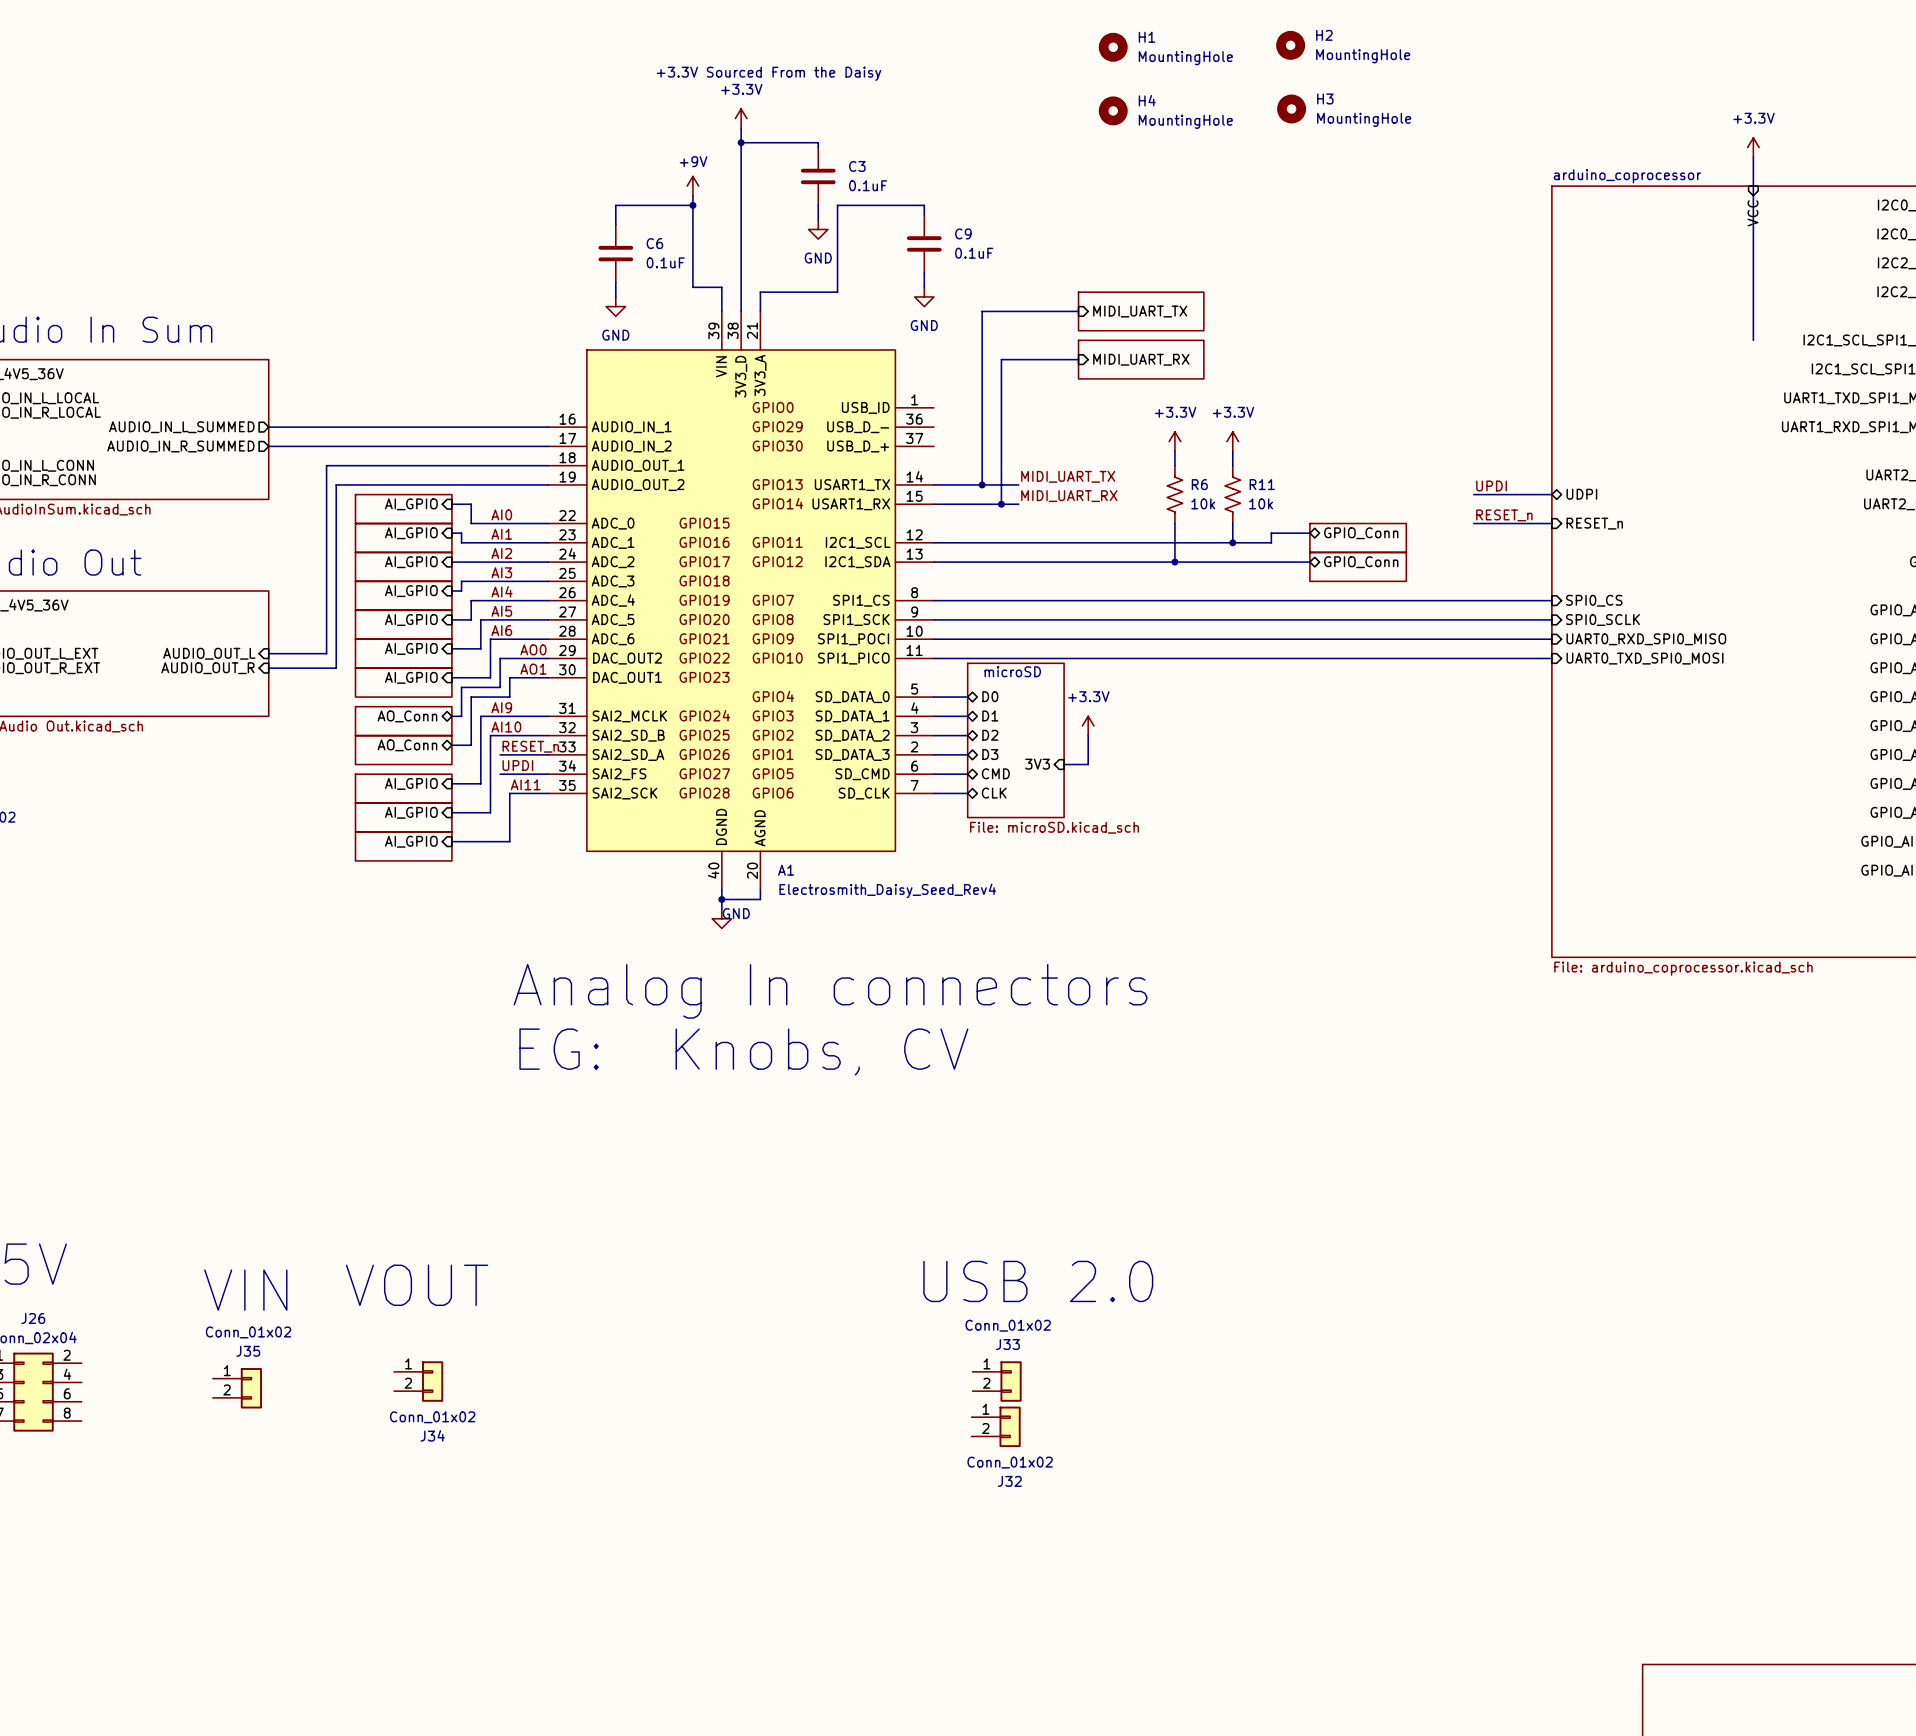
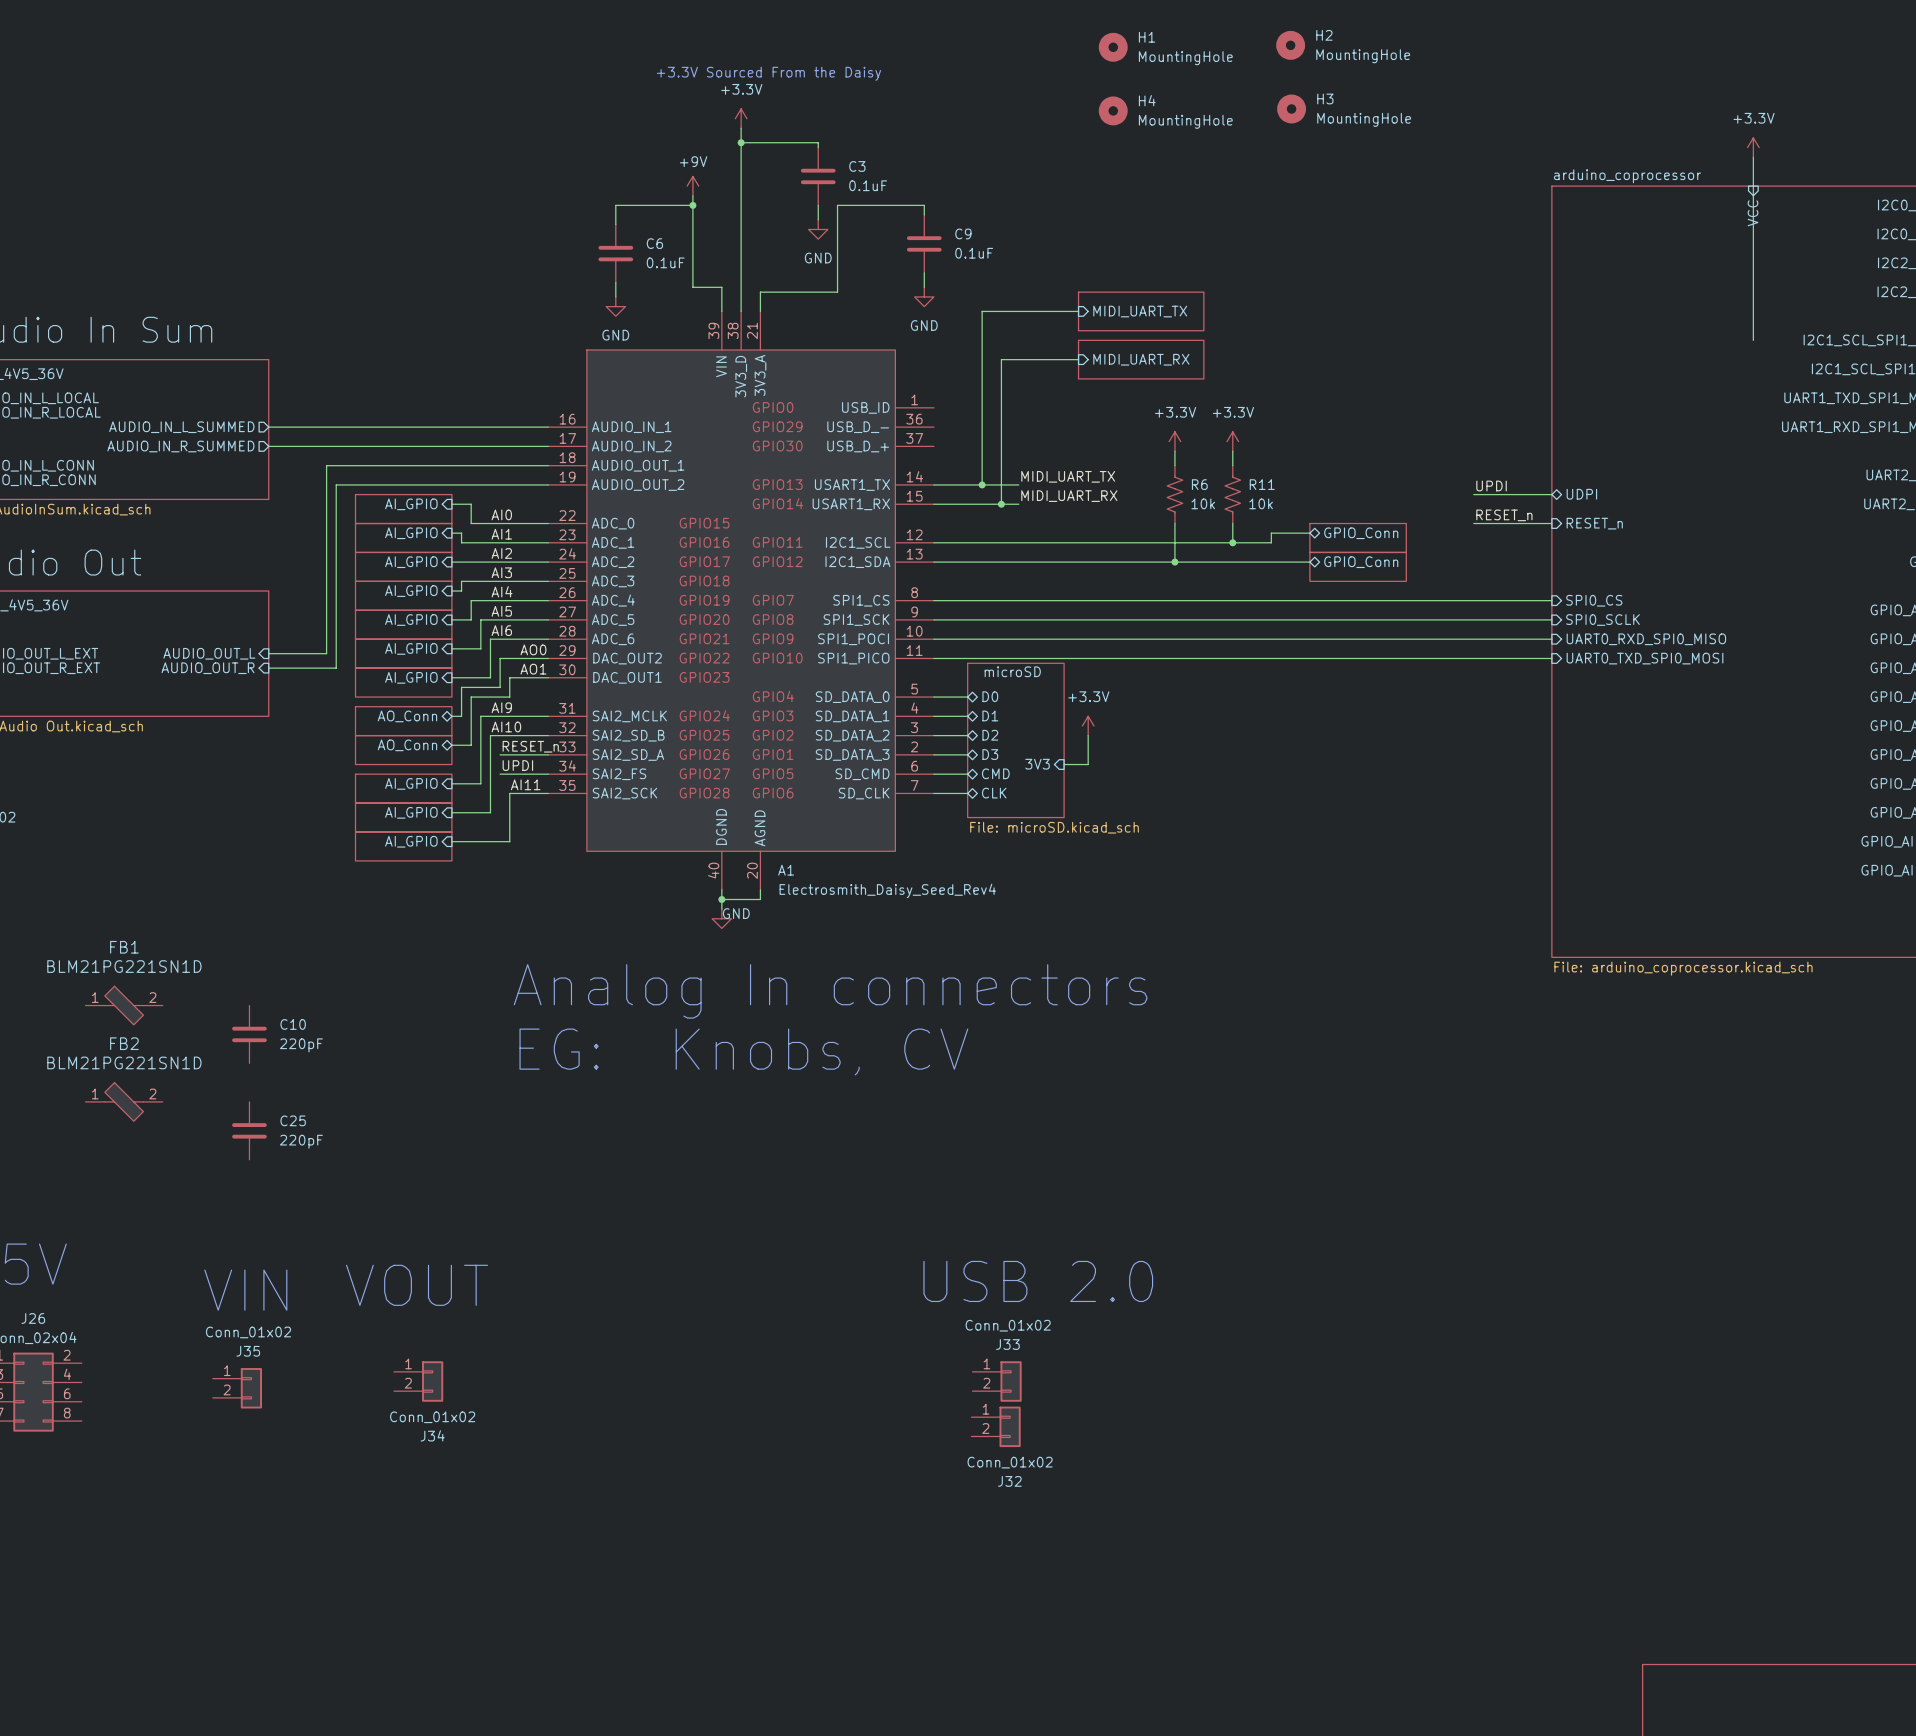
FB1: none -> BLM21PG221SN1D (124, 1005)
C10: none -> 220pF (249, 1034)
FB2: none -> BLM21PG221SN1D (124, 1101)
C25: none -> 220pF (249, 1130)

